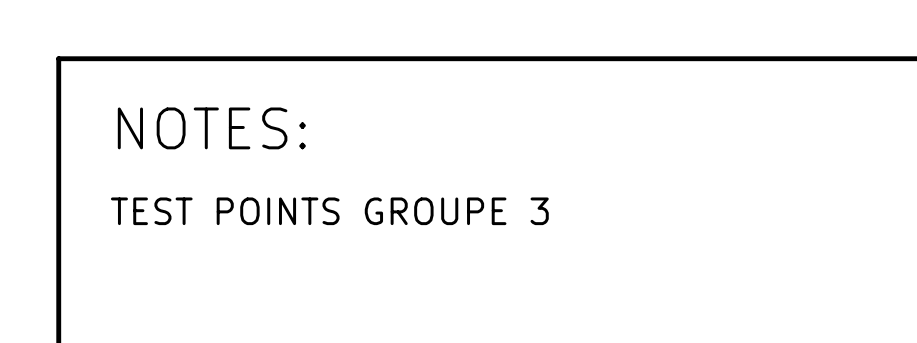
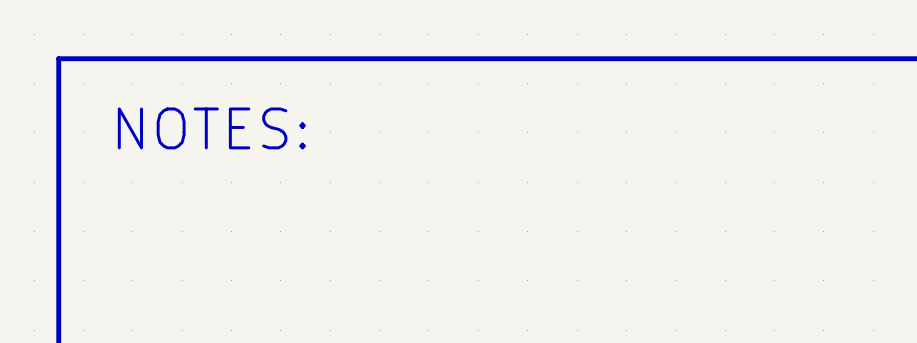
text: TEST POINTS GROUPE 3 (329, 211) -> none

